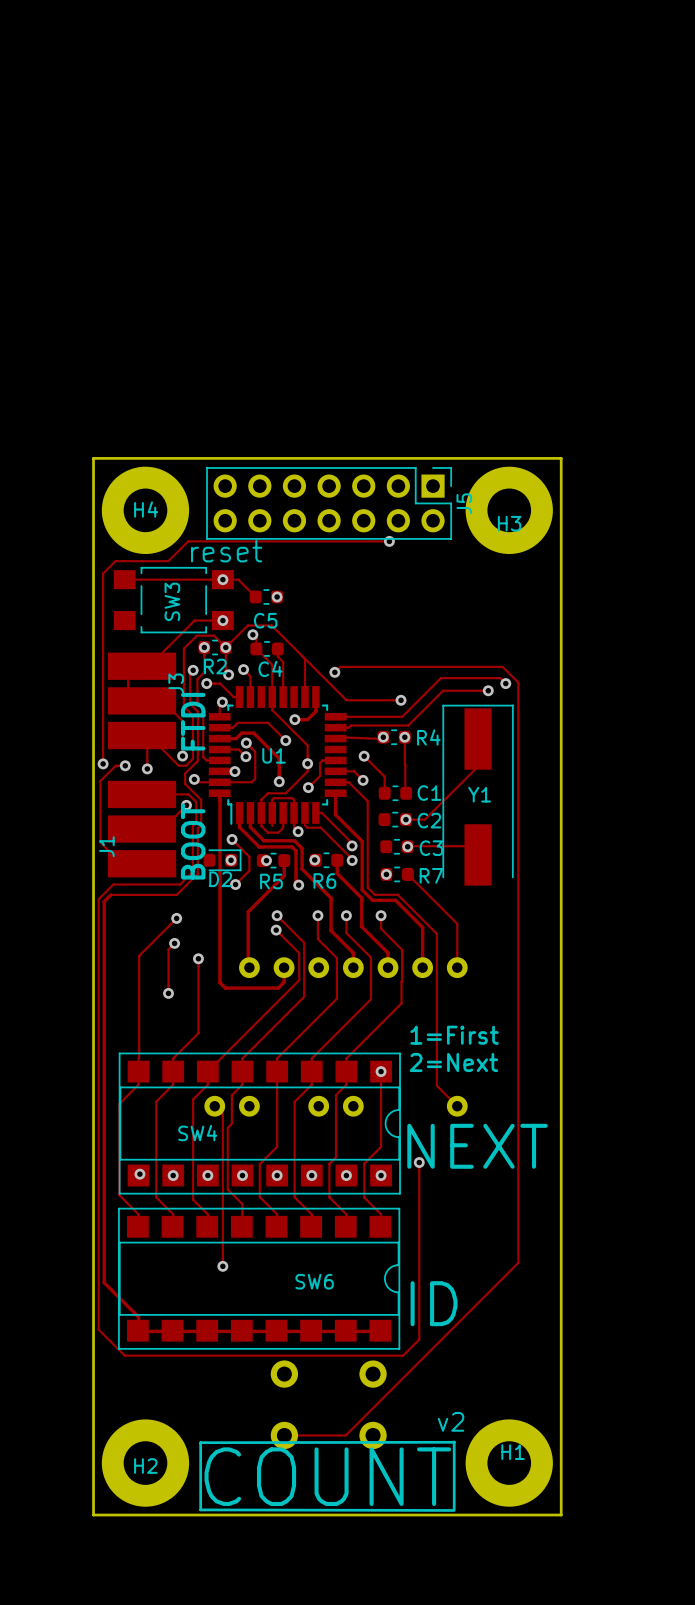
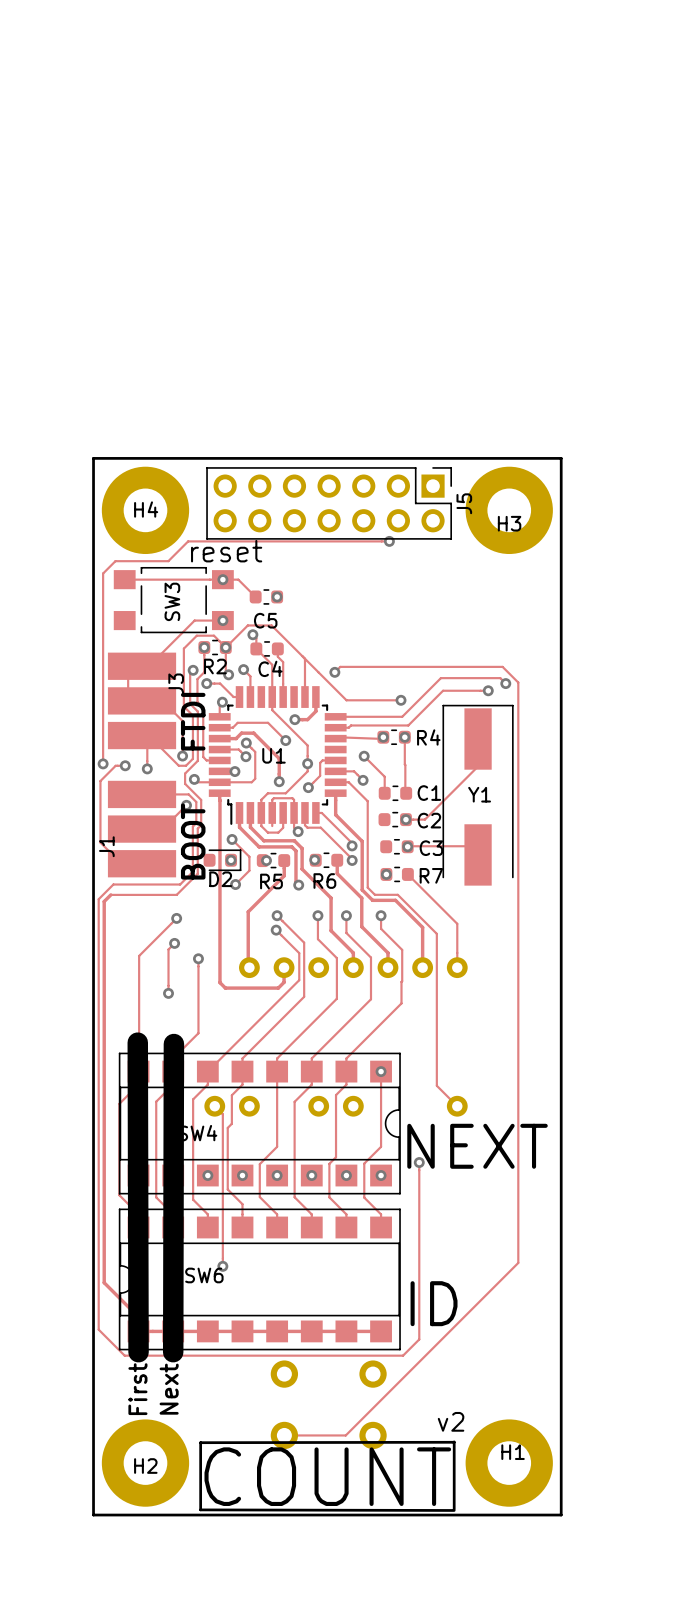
text: 1=First (454, 1035) -> none
line: none -> (137, 1042) (138, 1352)
line: none -> (173, 1044) (173, 1352)
text: 2=Next (453, 1062) -> none
SW6 rotation: 0° (259, 1278) -> 180° (259, 1279)
text: none -> First (137, 1389)
text: none -> Next (169, 1389)

